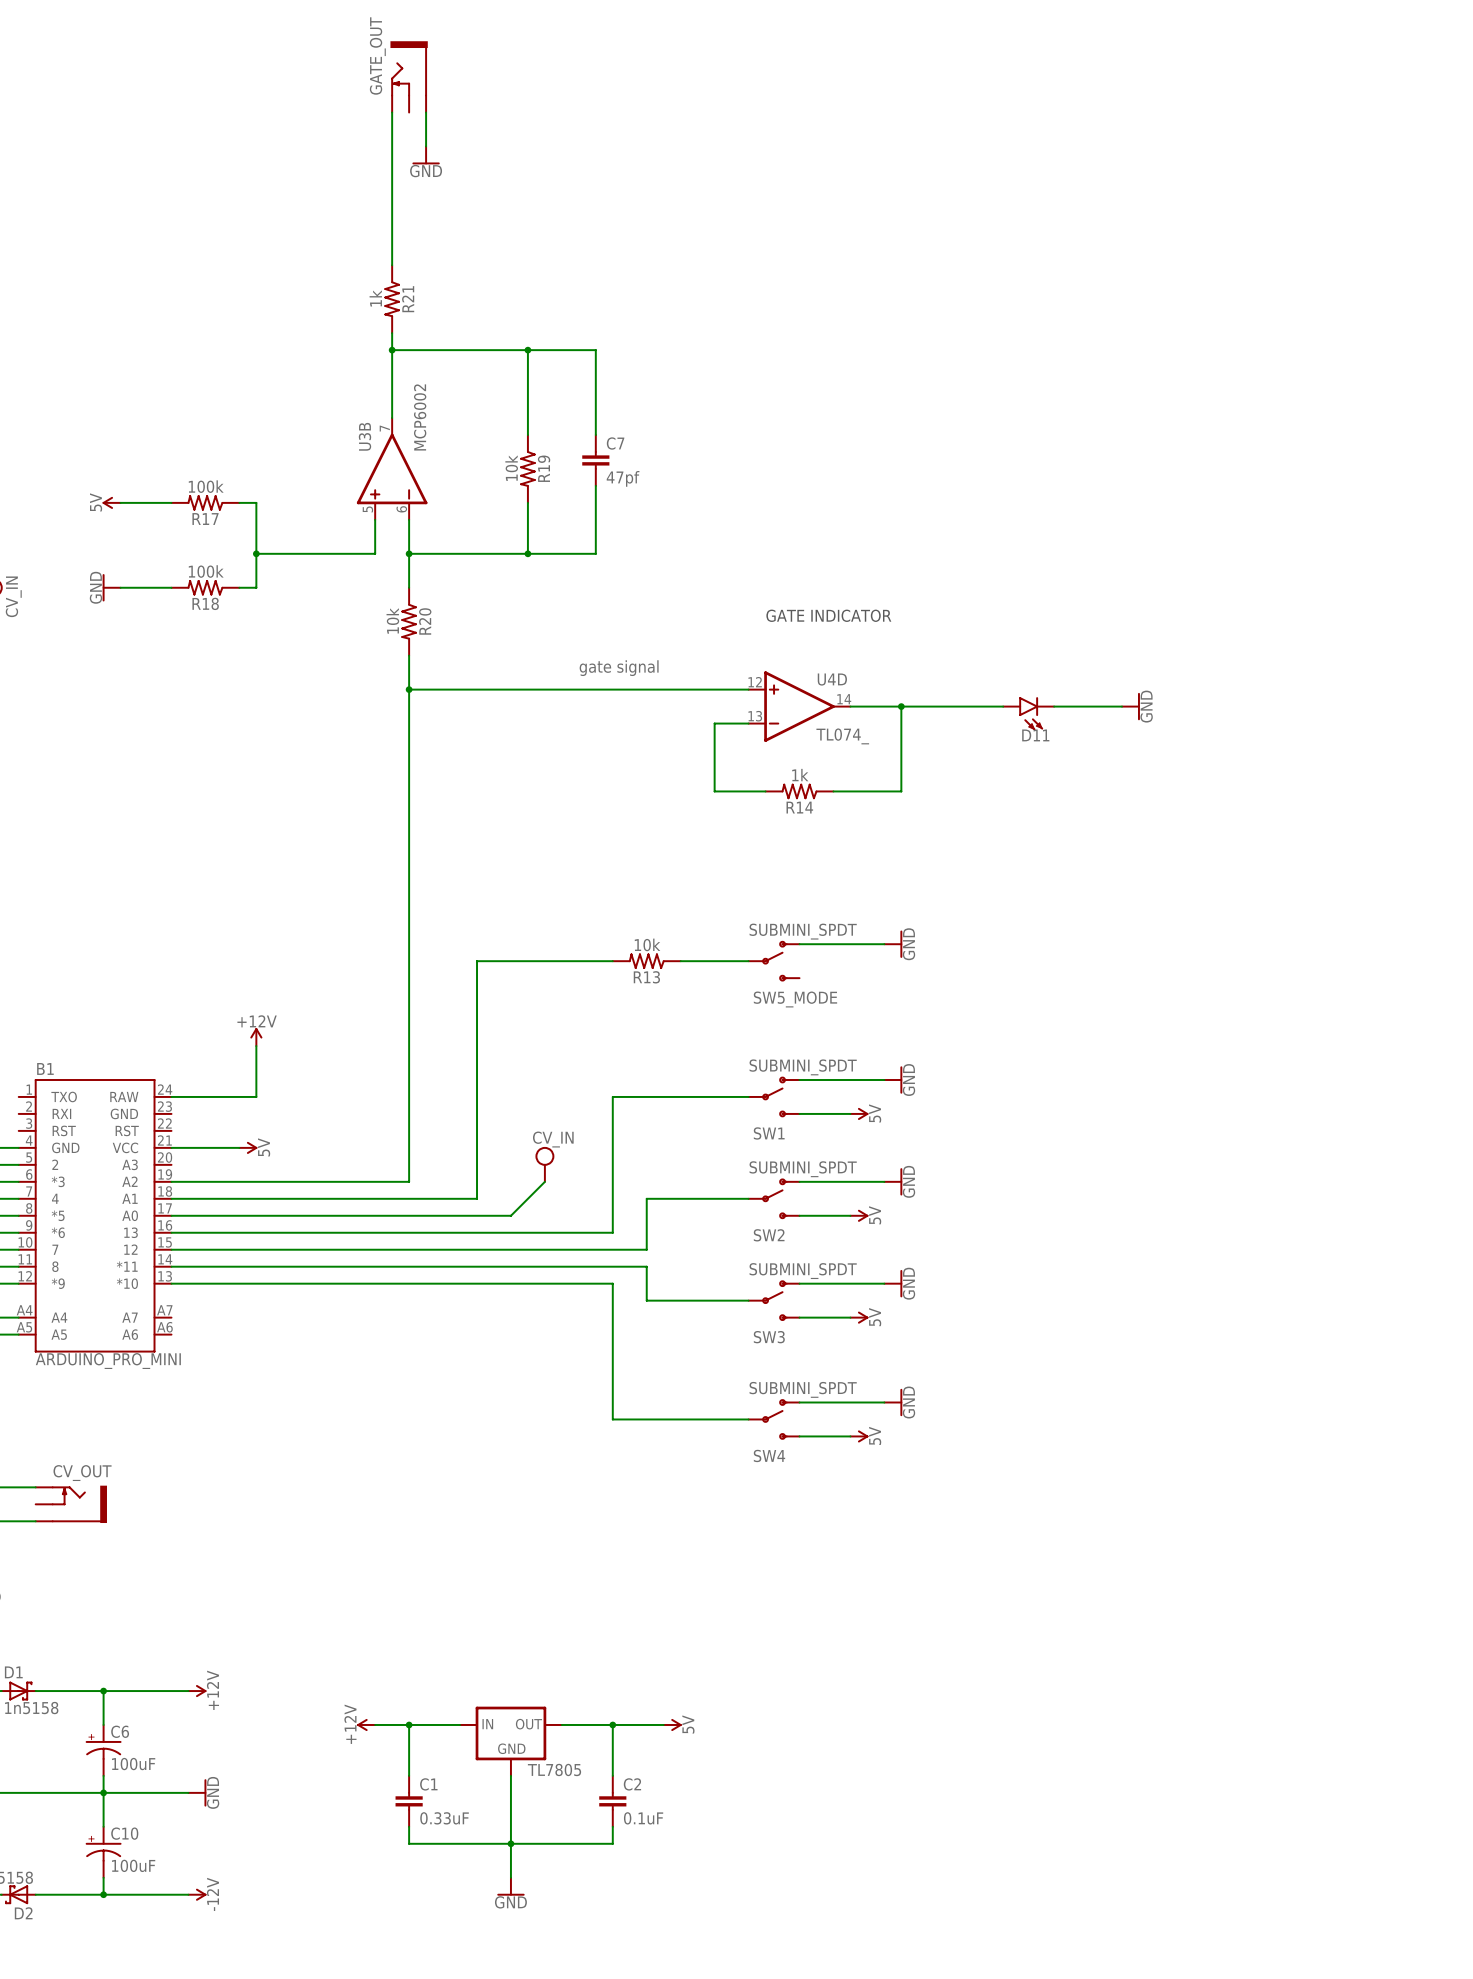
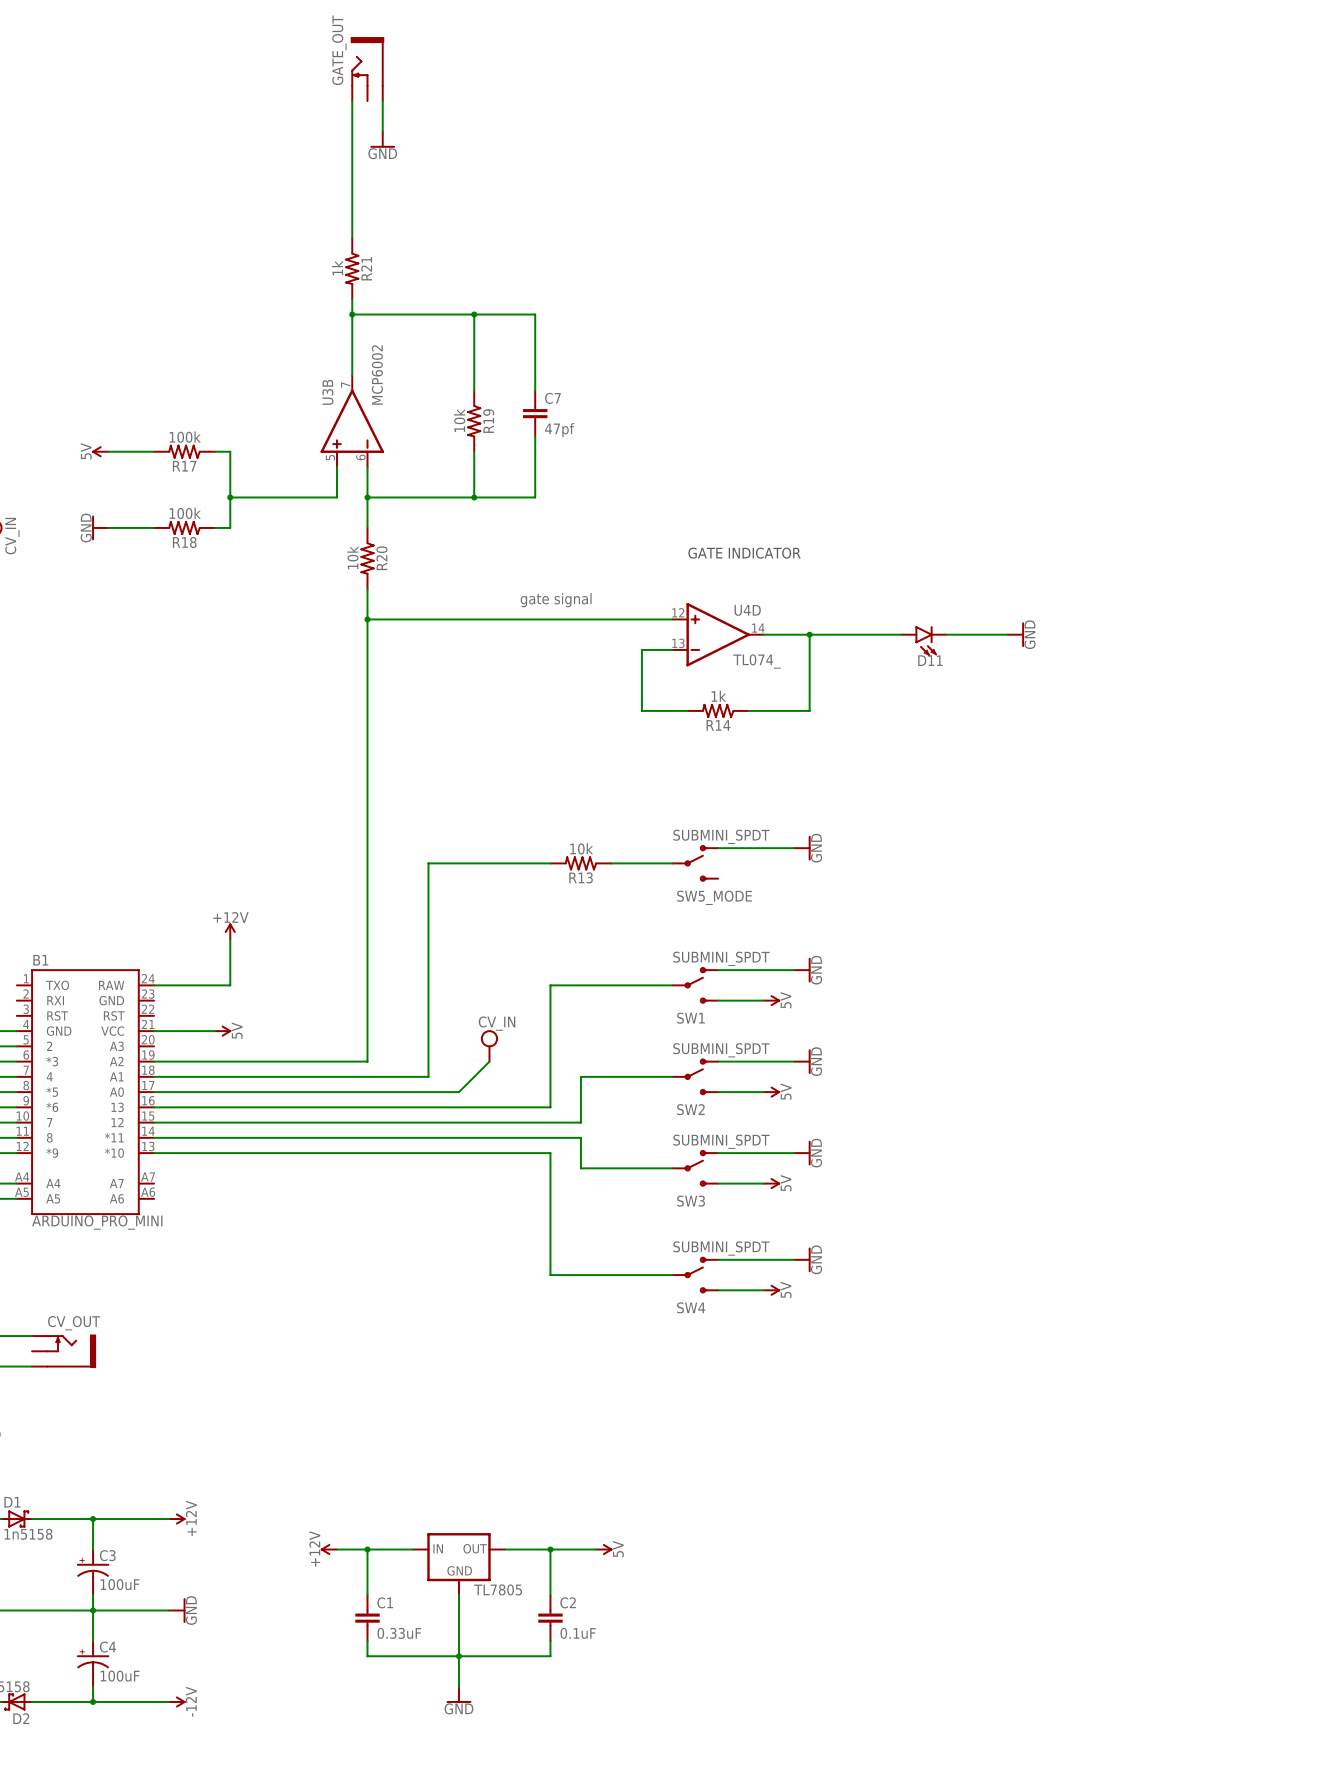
C6 name: C6 (120, 1731) -> C3 (107, 1555)
C10 name: C10 (124, 1833) -> C4 (107, 1647)

